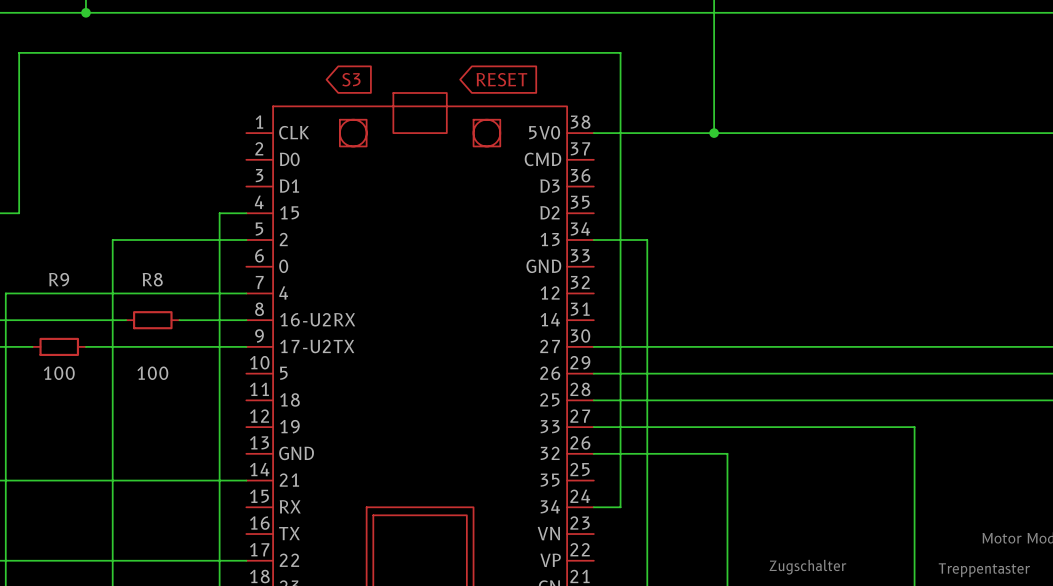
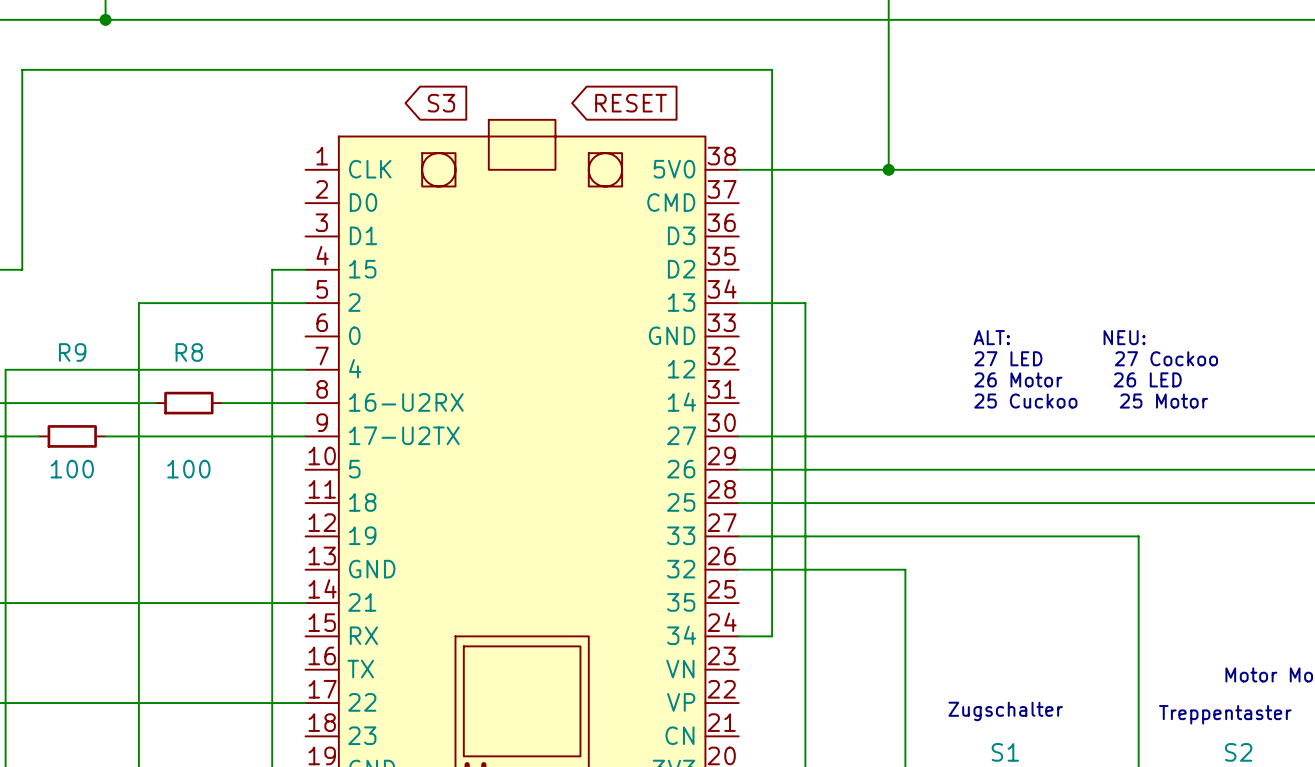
text: none -> ALT: NEU: (1059, 337)
text: none -> 27 LED 27 Cockoo (1096, 358)
text: none -> 26 Motor 26 LED (1078, 379)
text: none -> 25 Cuckoo 25 Motor (1091, 401)

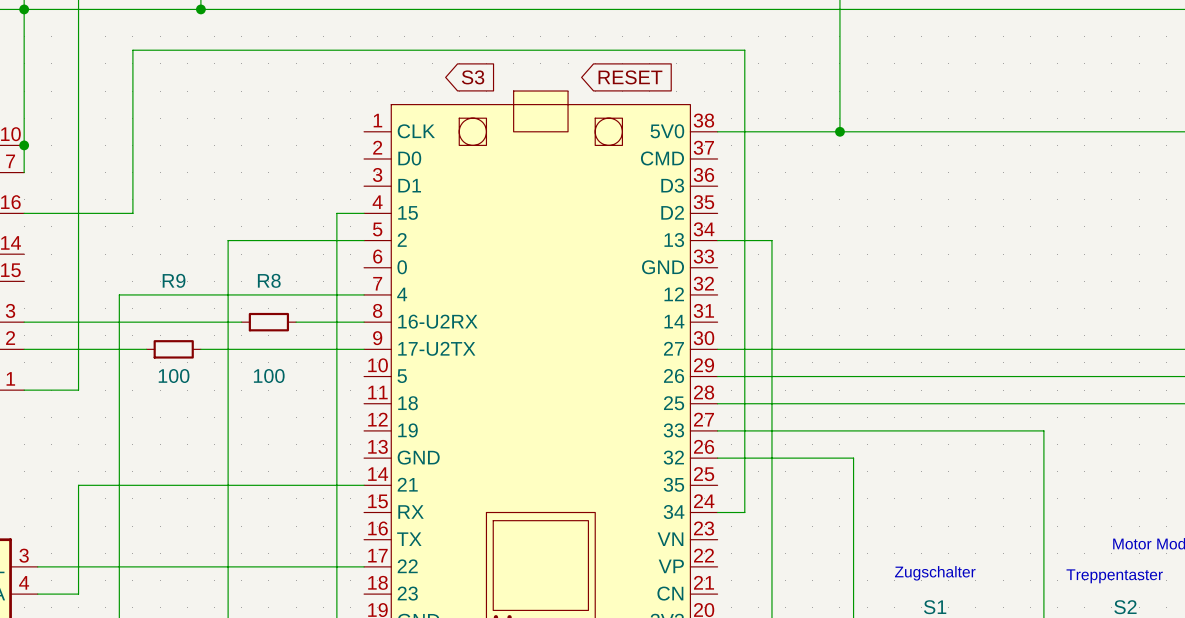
text: ALT: NEU: (1059, 337) -> none
text: 27 LED 27 Cockoo (1096, 358) -> none
text: 26 Motor 26 LED (1078, 379) -> none
text: 25 Cuckoo 25 Motor (1091, 401) -> none

